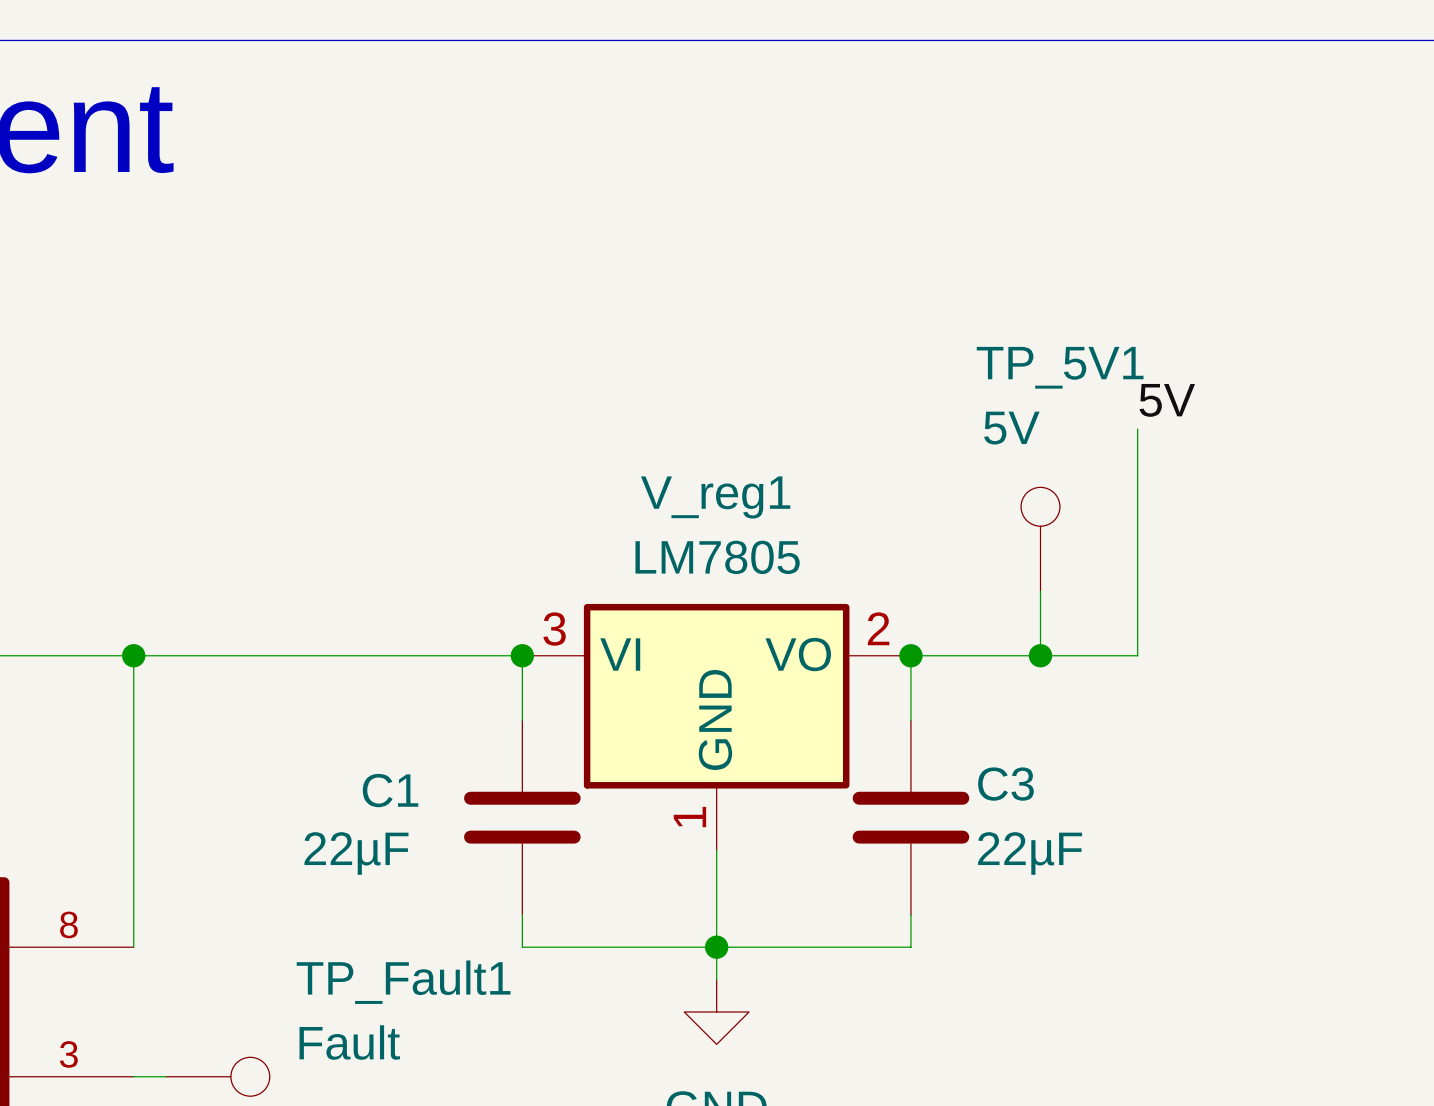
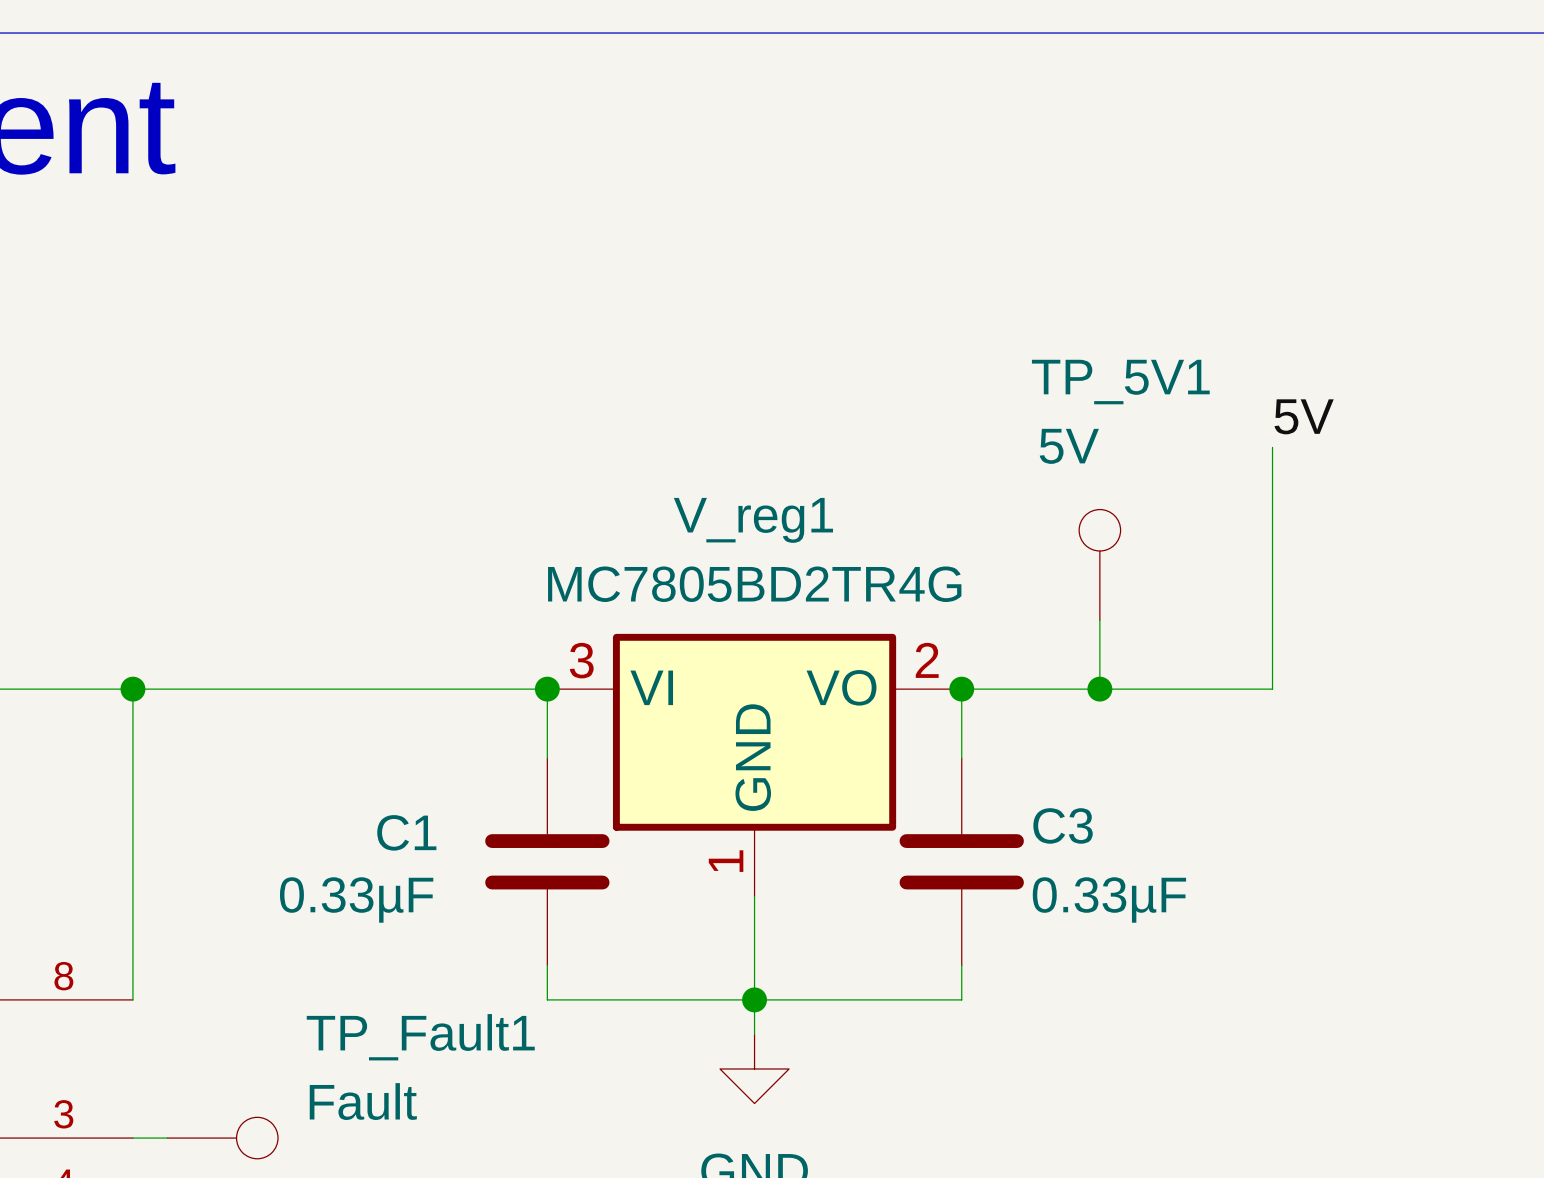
label position: 5V (1167, 400) -> 5V (1304, 416)
wire: (1137, 429) (1137, 655) -> (1272, 447) (1272, 689) (1203, 689)
V_reg1 value: LM7805 (717, 557) -> MC7805BD2TR4G (754, 584)
C1 value: 22µF (356, 853) -> 0.33µF (356, 899)
C3 value: 22µF (1030, 853) -> 0.33µF (1109, 899)

